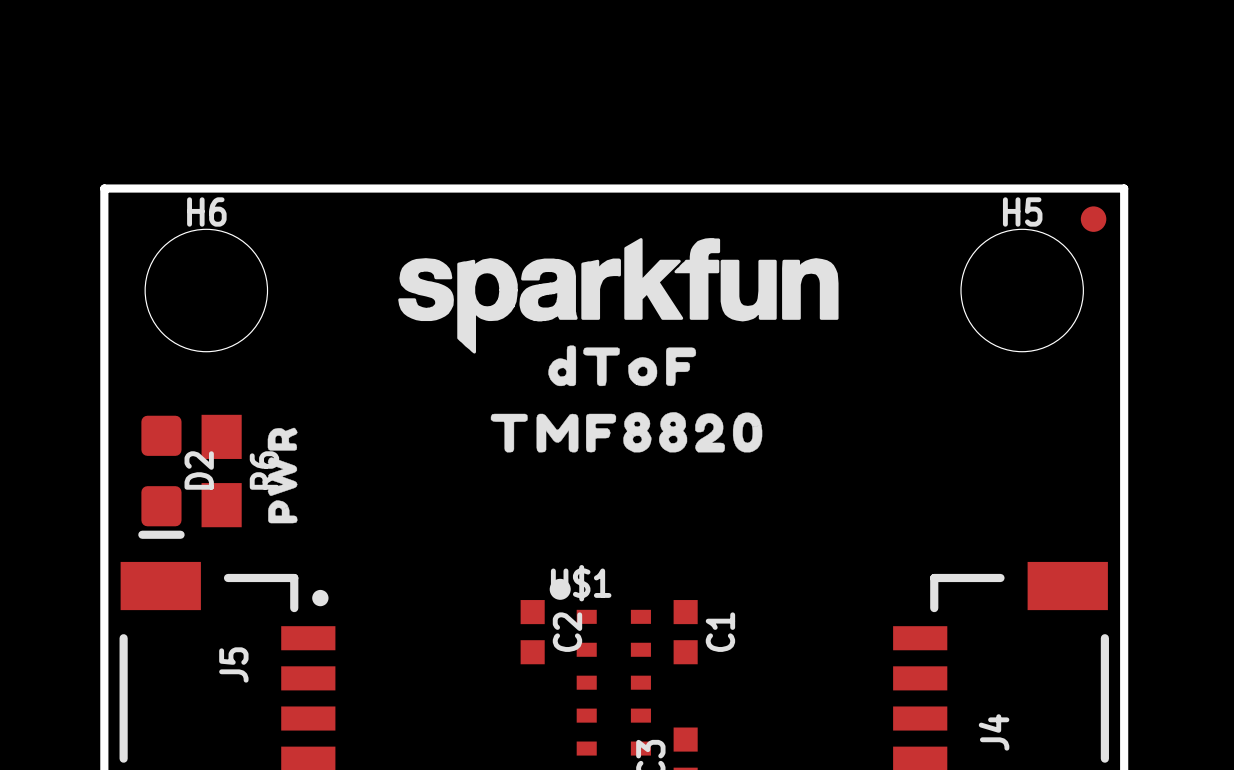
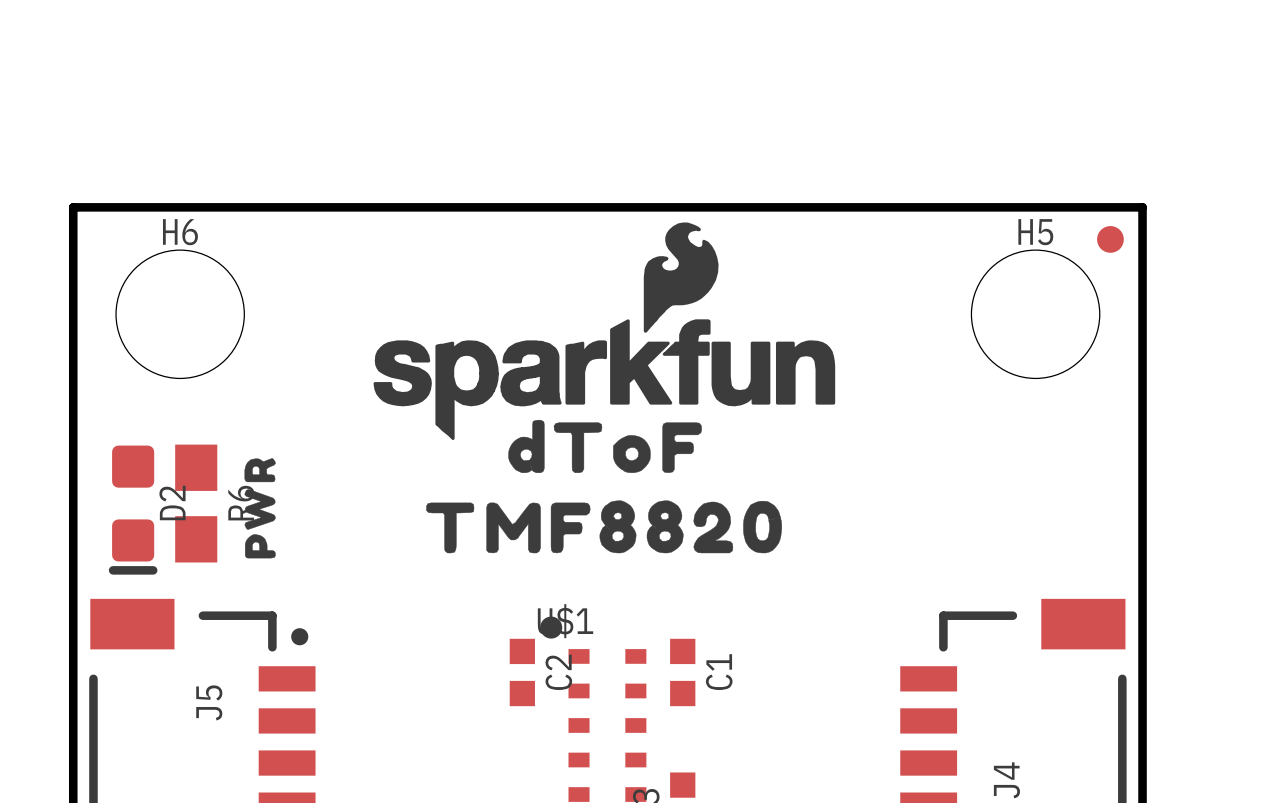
drawing shape: [398, 238, 839, 354] -> [373, 222, 836, 440]
drawing: [548, 345, 697, 387] -> none
drawing shape: [490, 412, 763, 453] -> [508, 419, 702, 473]
drawing: none -> [426, 500, 782, 554]

